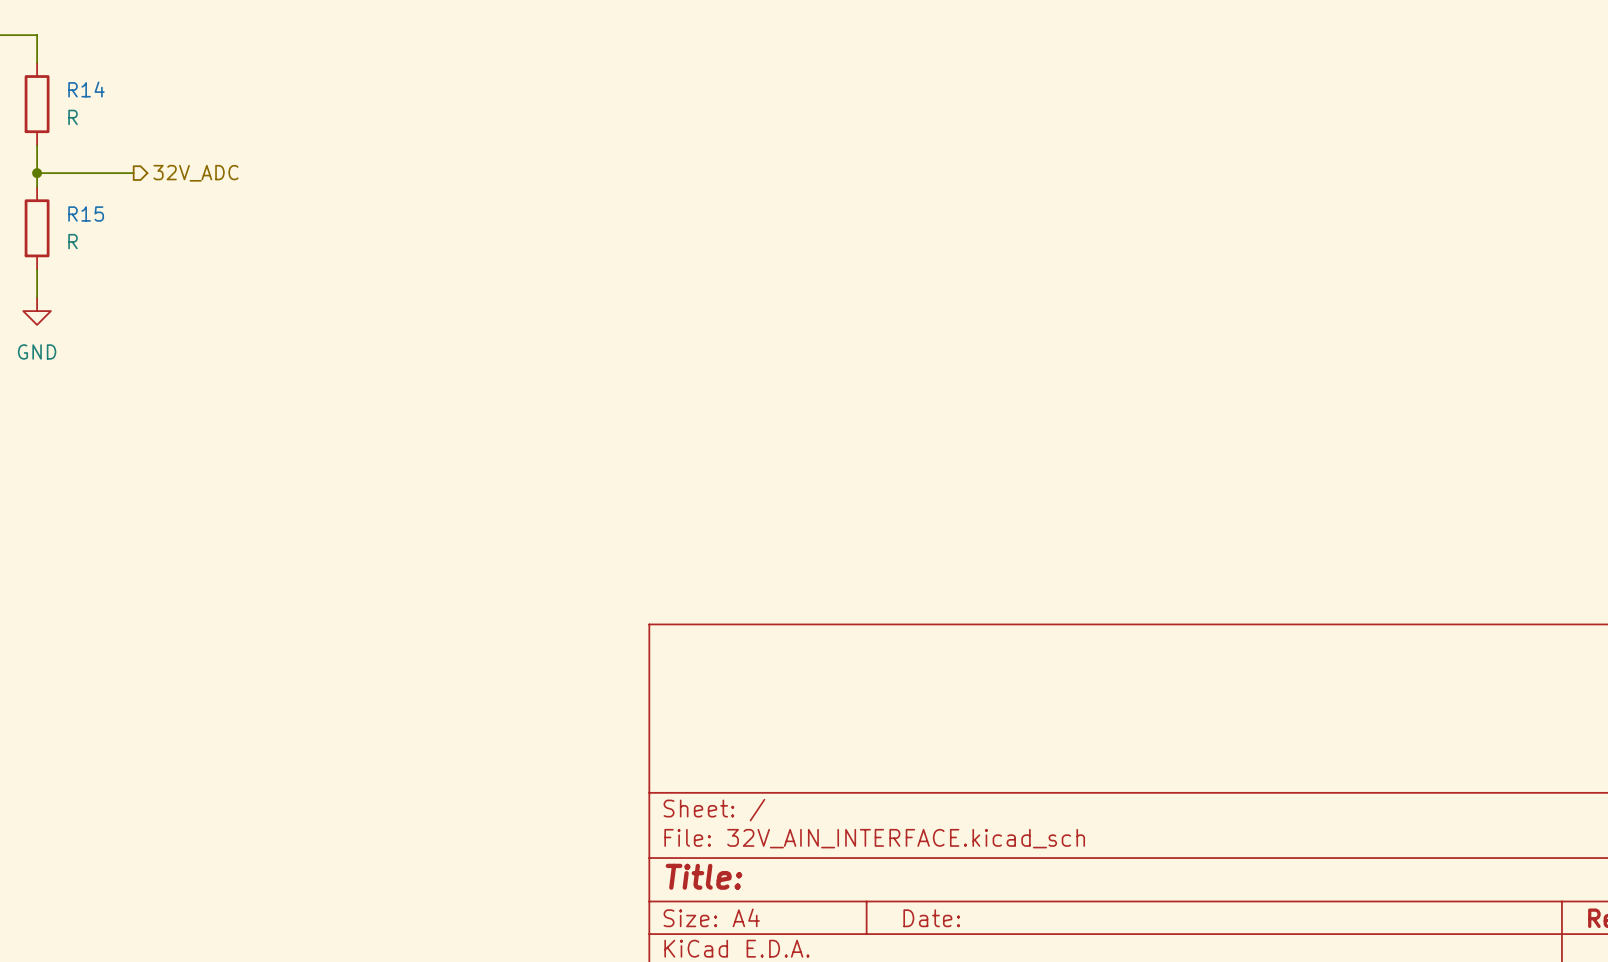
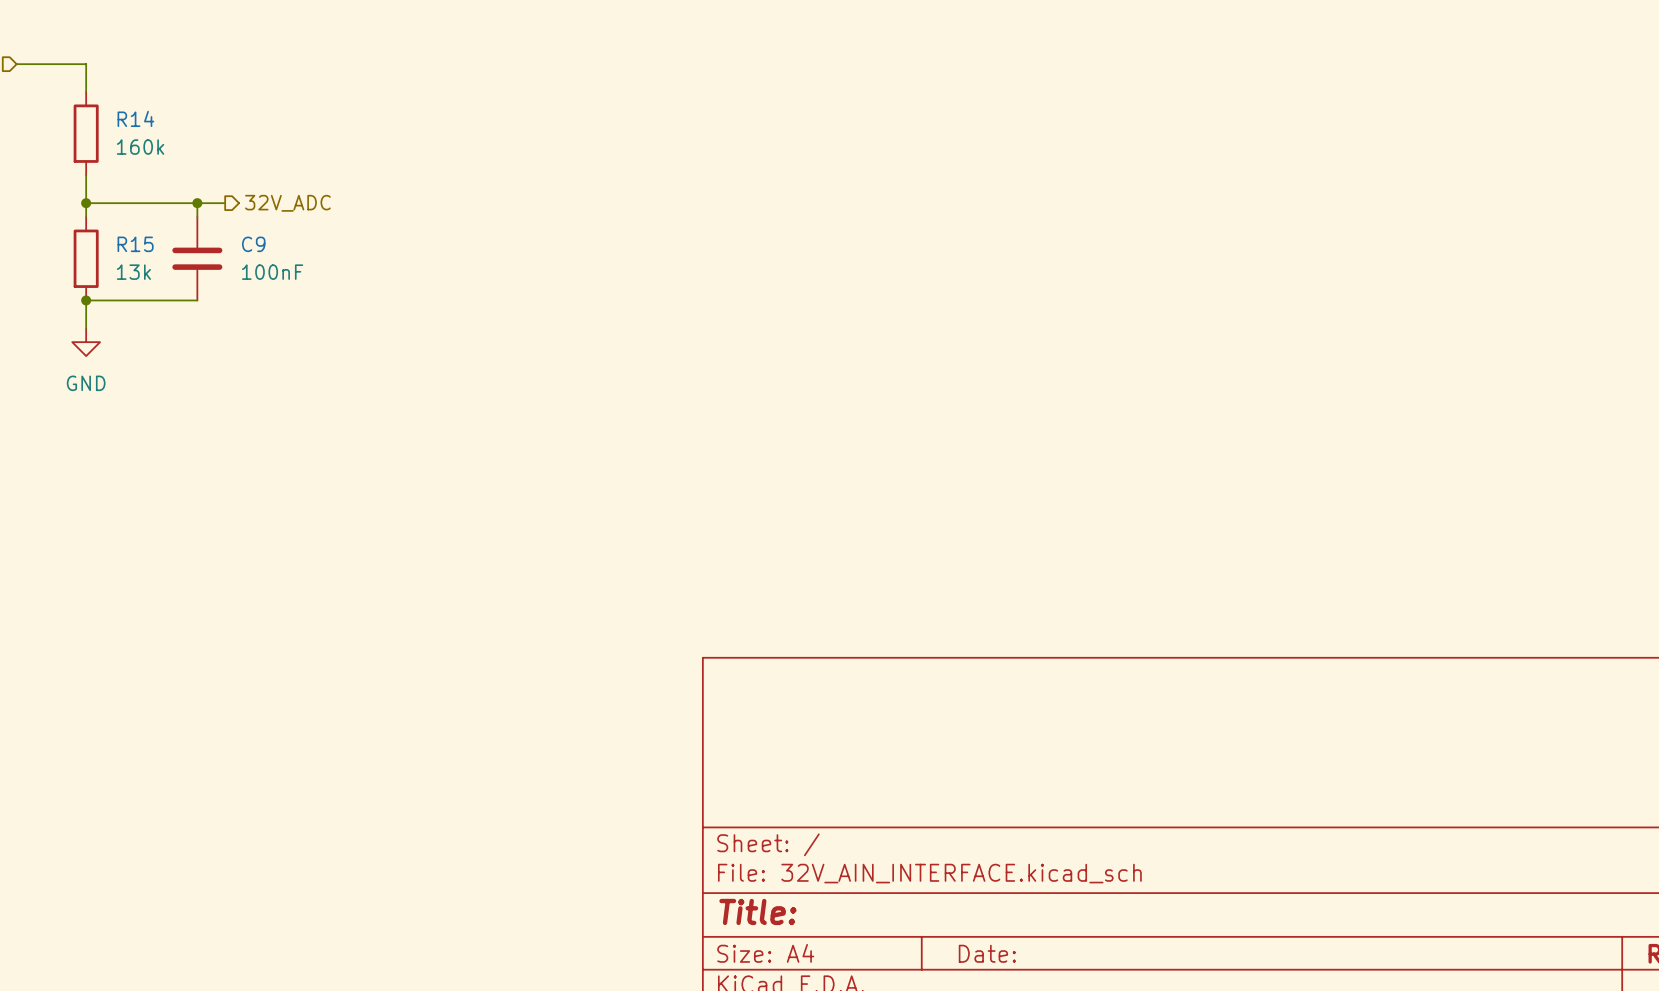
R14 value: R (73, 117) -> 160k (140, 147)
wire: none -> (183, 203) (225, 203)
wire: none -> (197, 203) (197, 217)
junction: none -> (197, 203)
hierarchical label position: 32V_ADC (195, 173) -> 32V_ADC (287, 203)
C9: none -> 100nF (197, 258)
R15 value: R (73, 241) -> 13k (133, 272)
wire: none -> (86, 300) (197, 300)
junction: none -> (86, 300)

